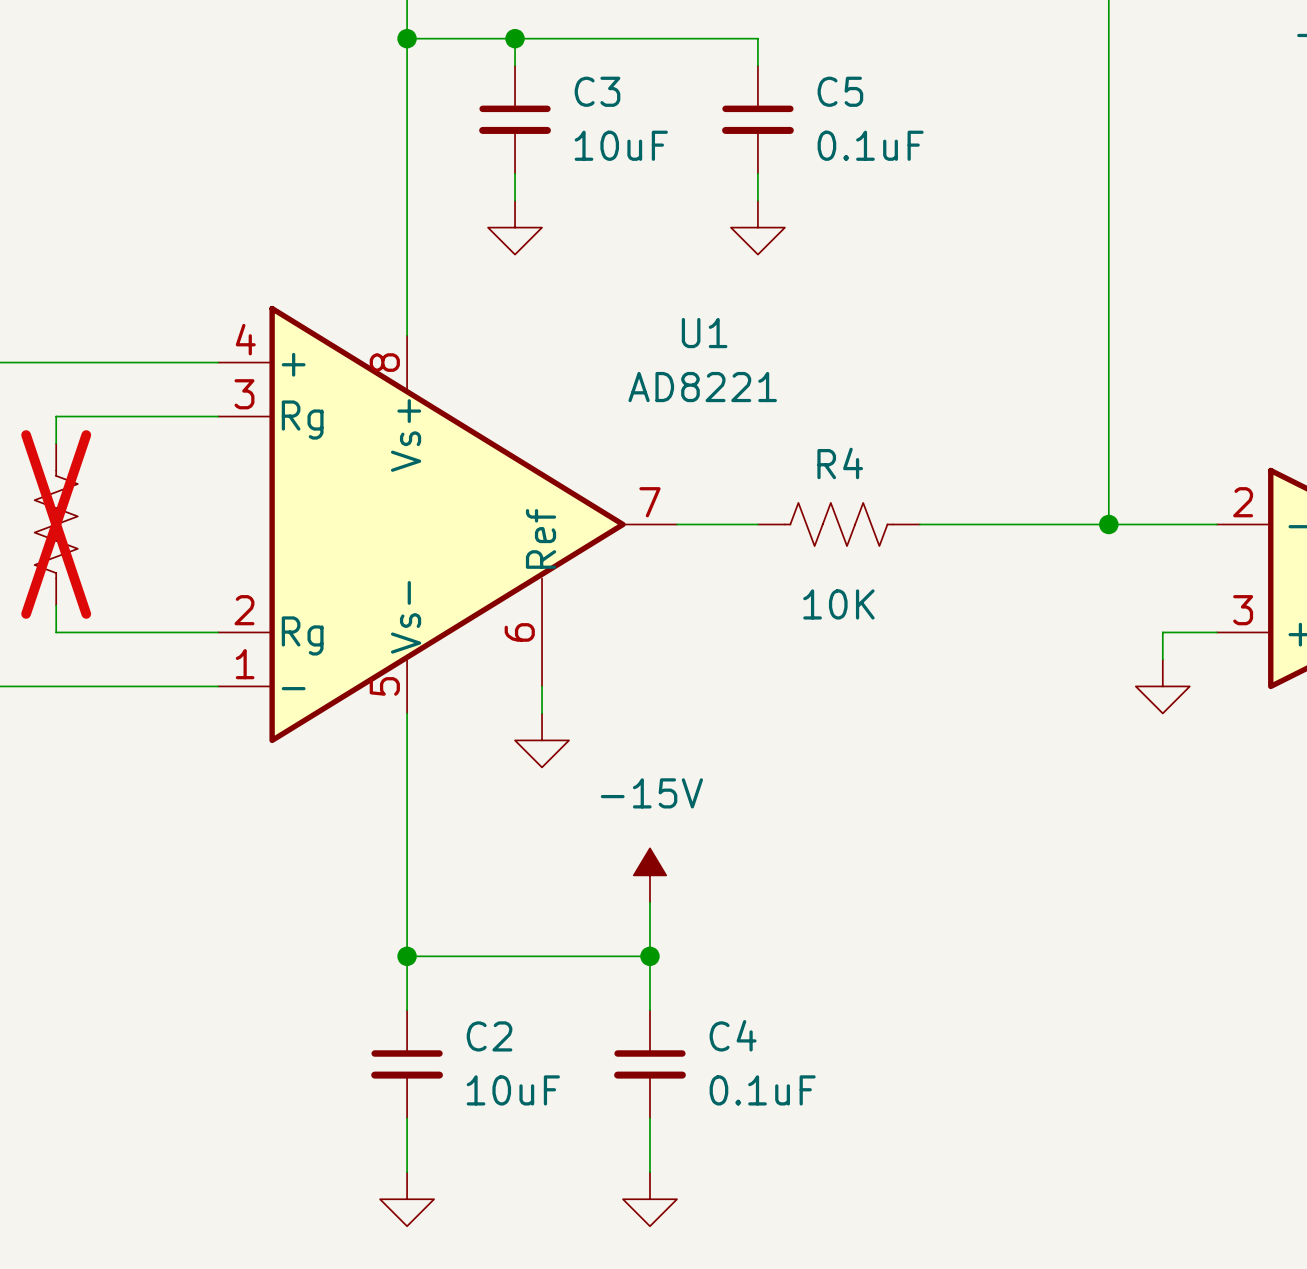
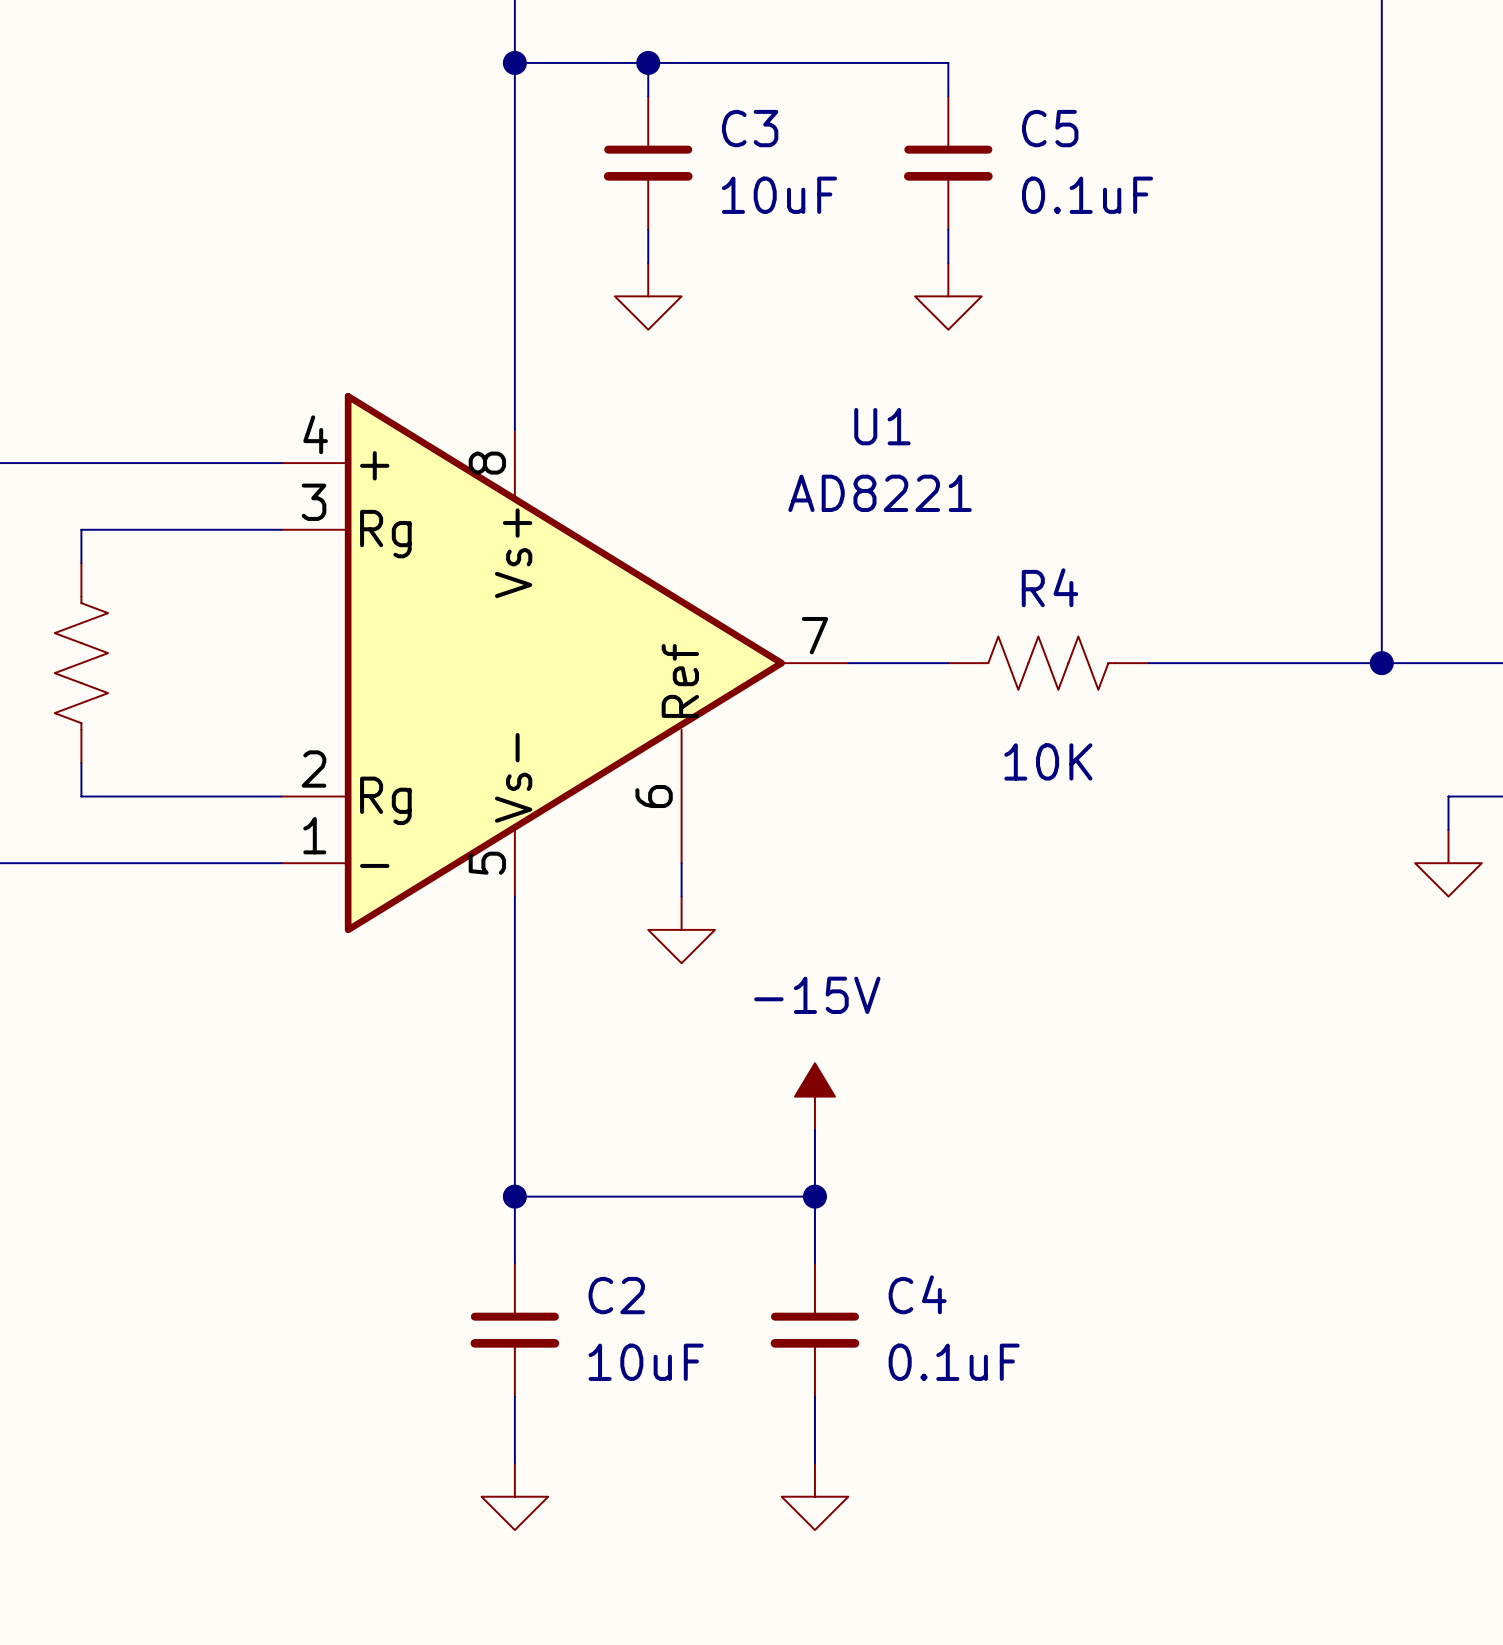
part do-not-place cross: (56, 524) -> none

